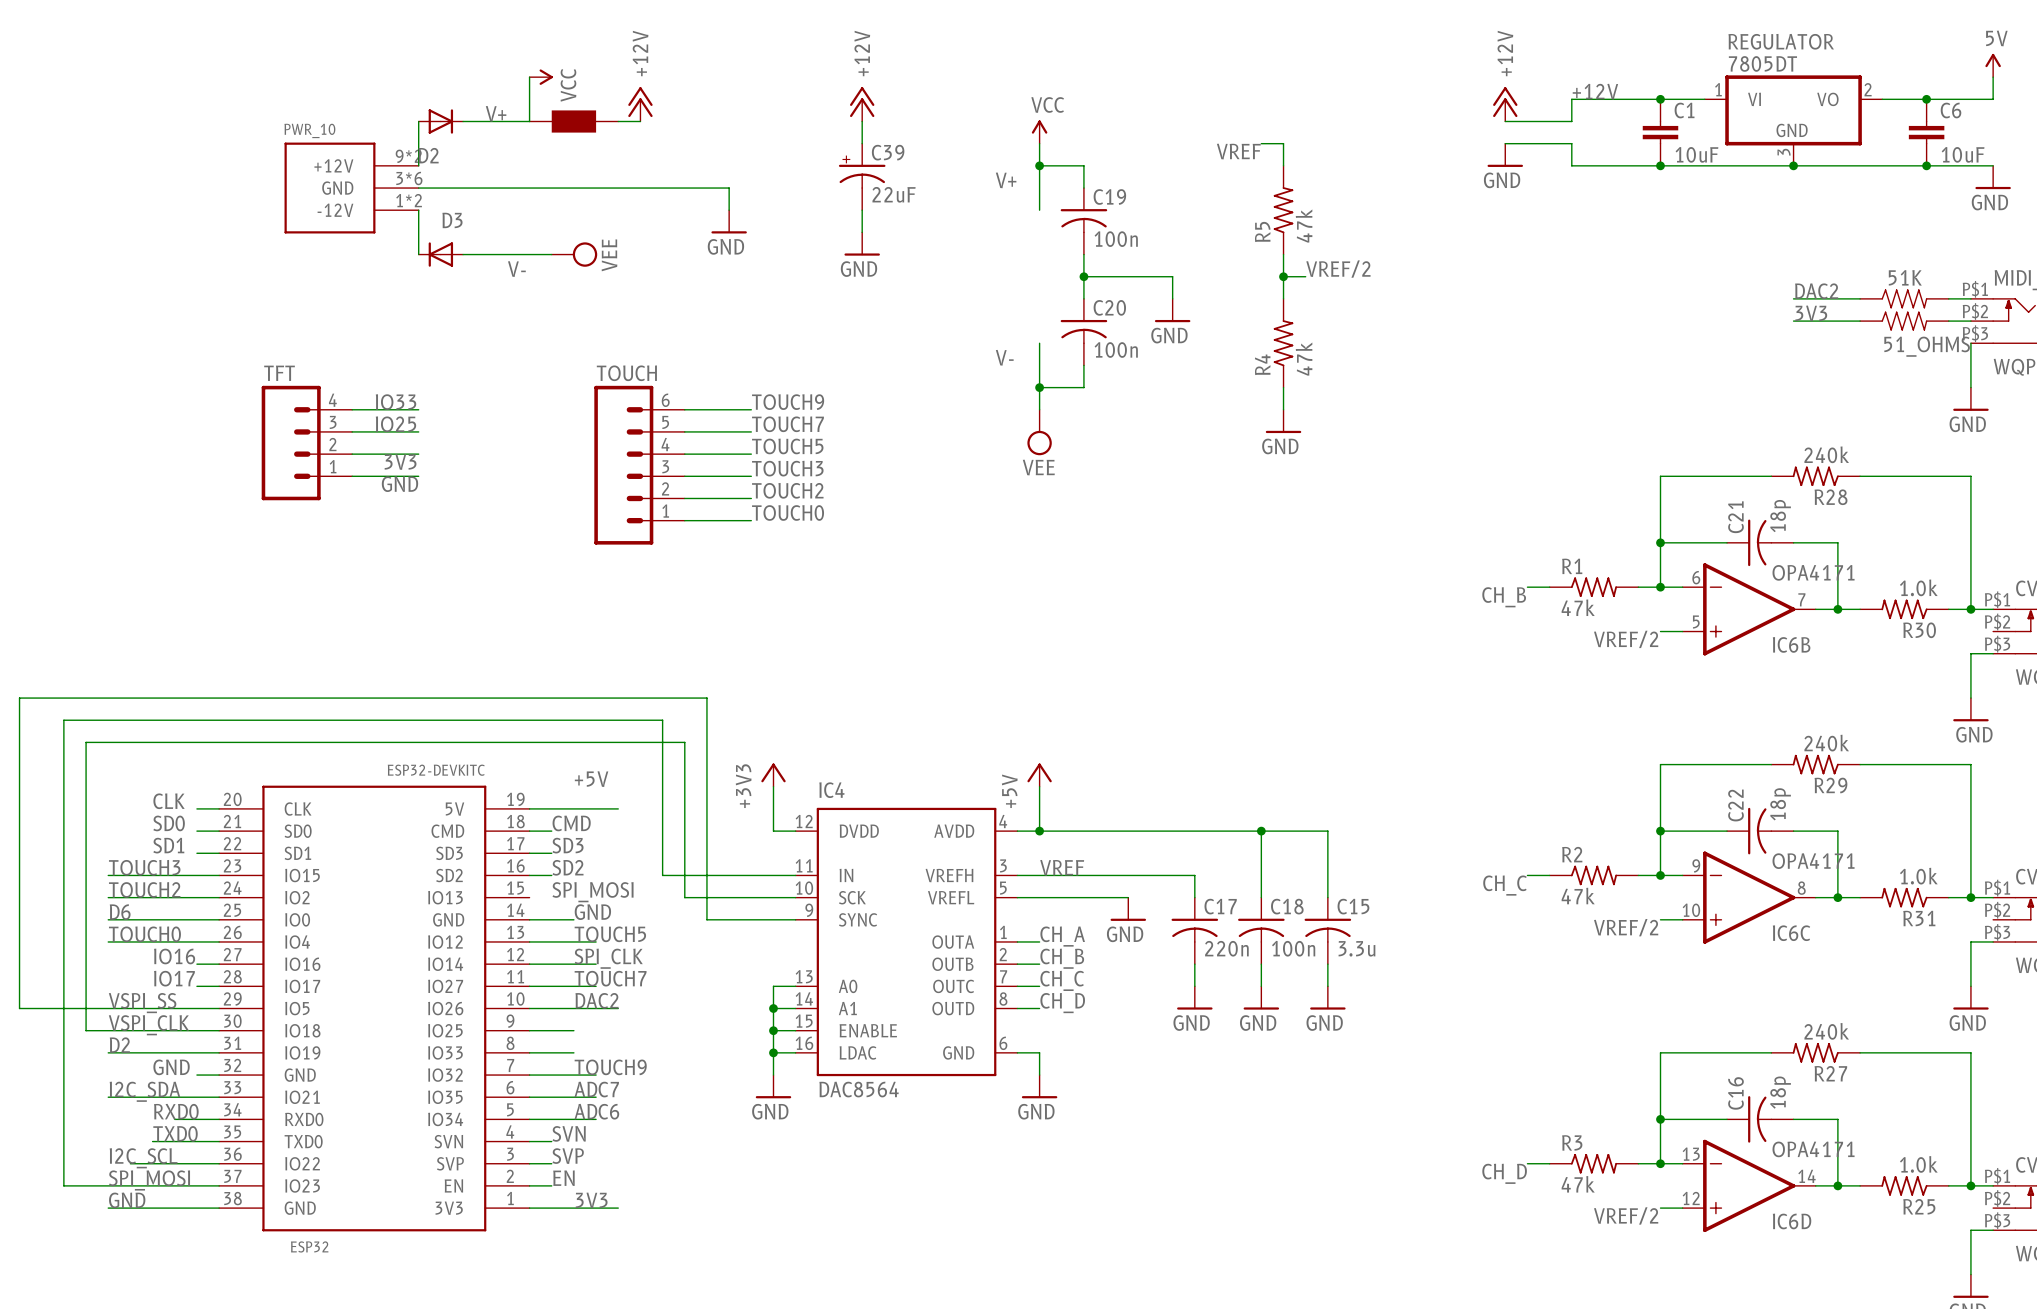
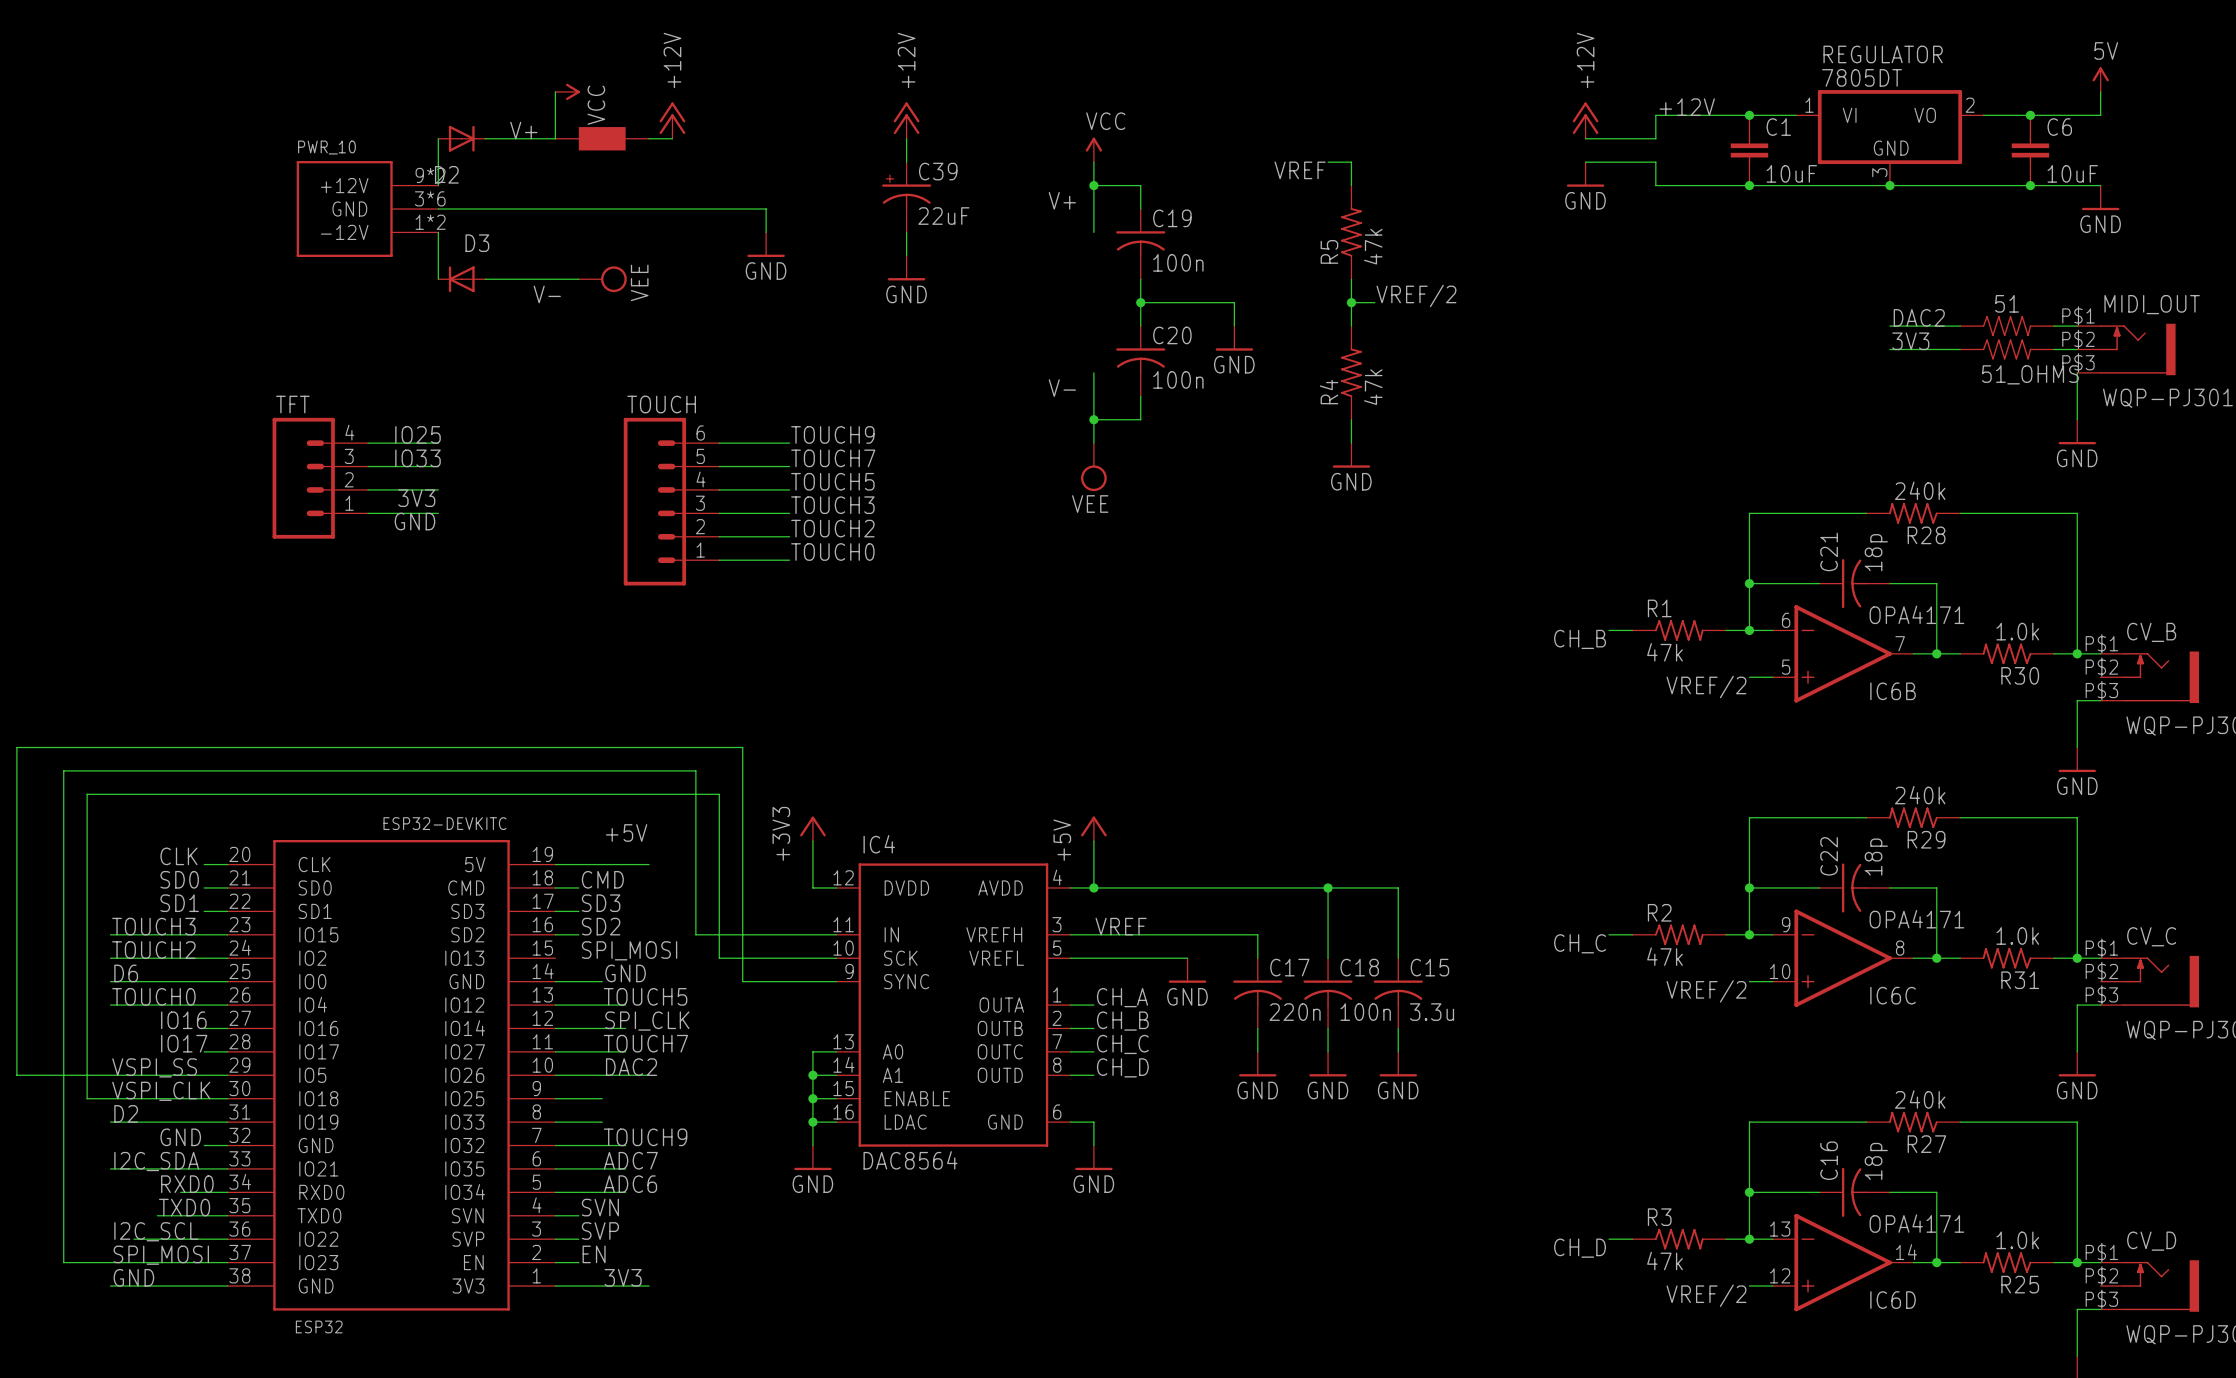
51K name: 51K (1905, 277) -> 51 (2007, 303)
label: IO33 (396, 402) -> IO25 (418, 434)
label: IO25 (395, 424) -> IO33 (418, 458)

